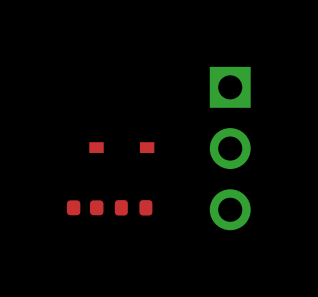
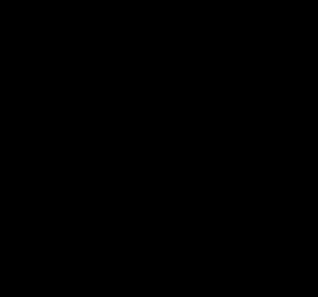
part: (121, 147) -> none
part: (230, 148) -> none
part: (85, 207) -> none
part: (133, 207) -> none

